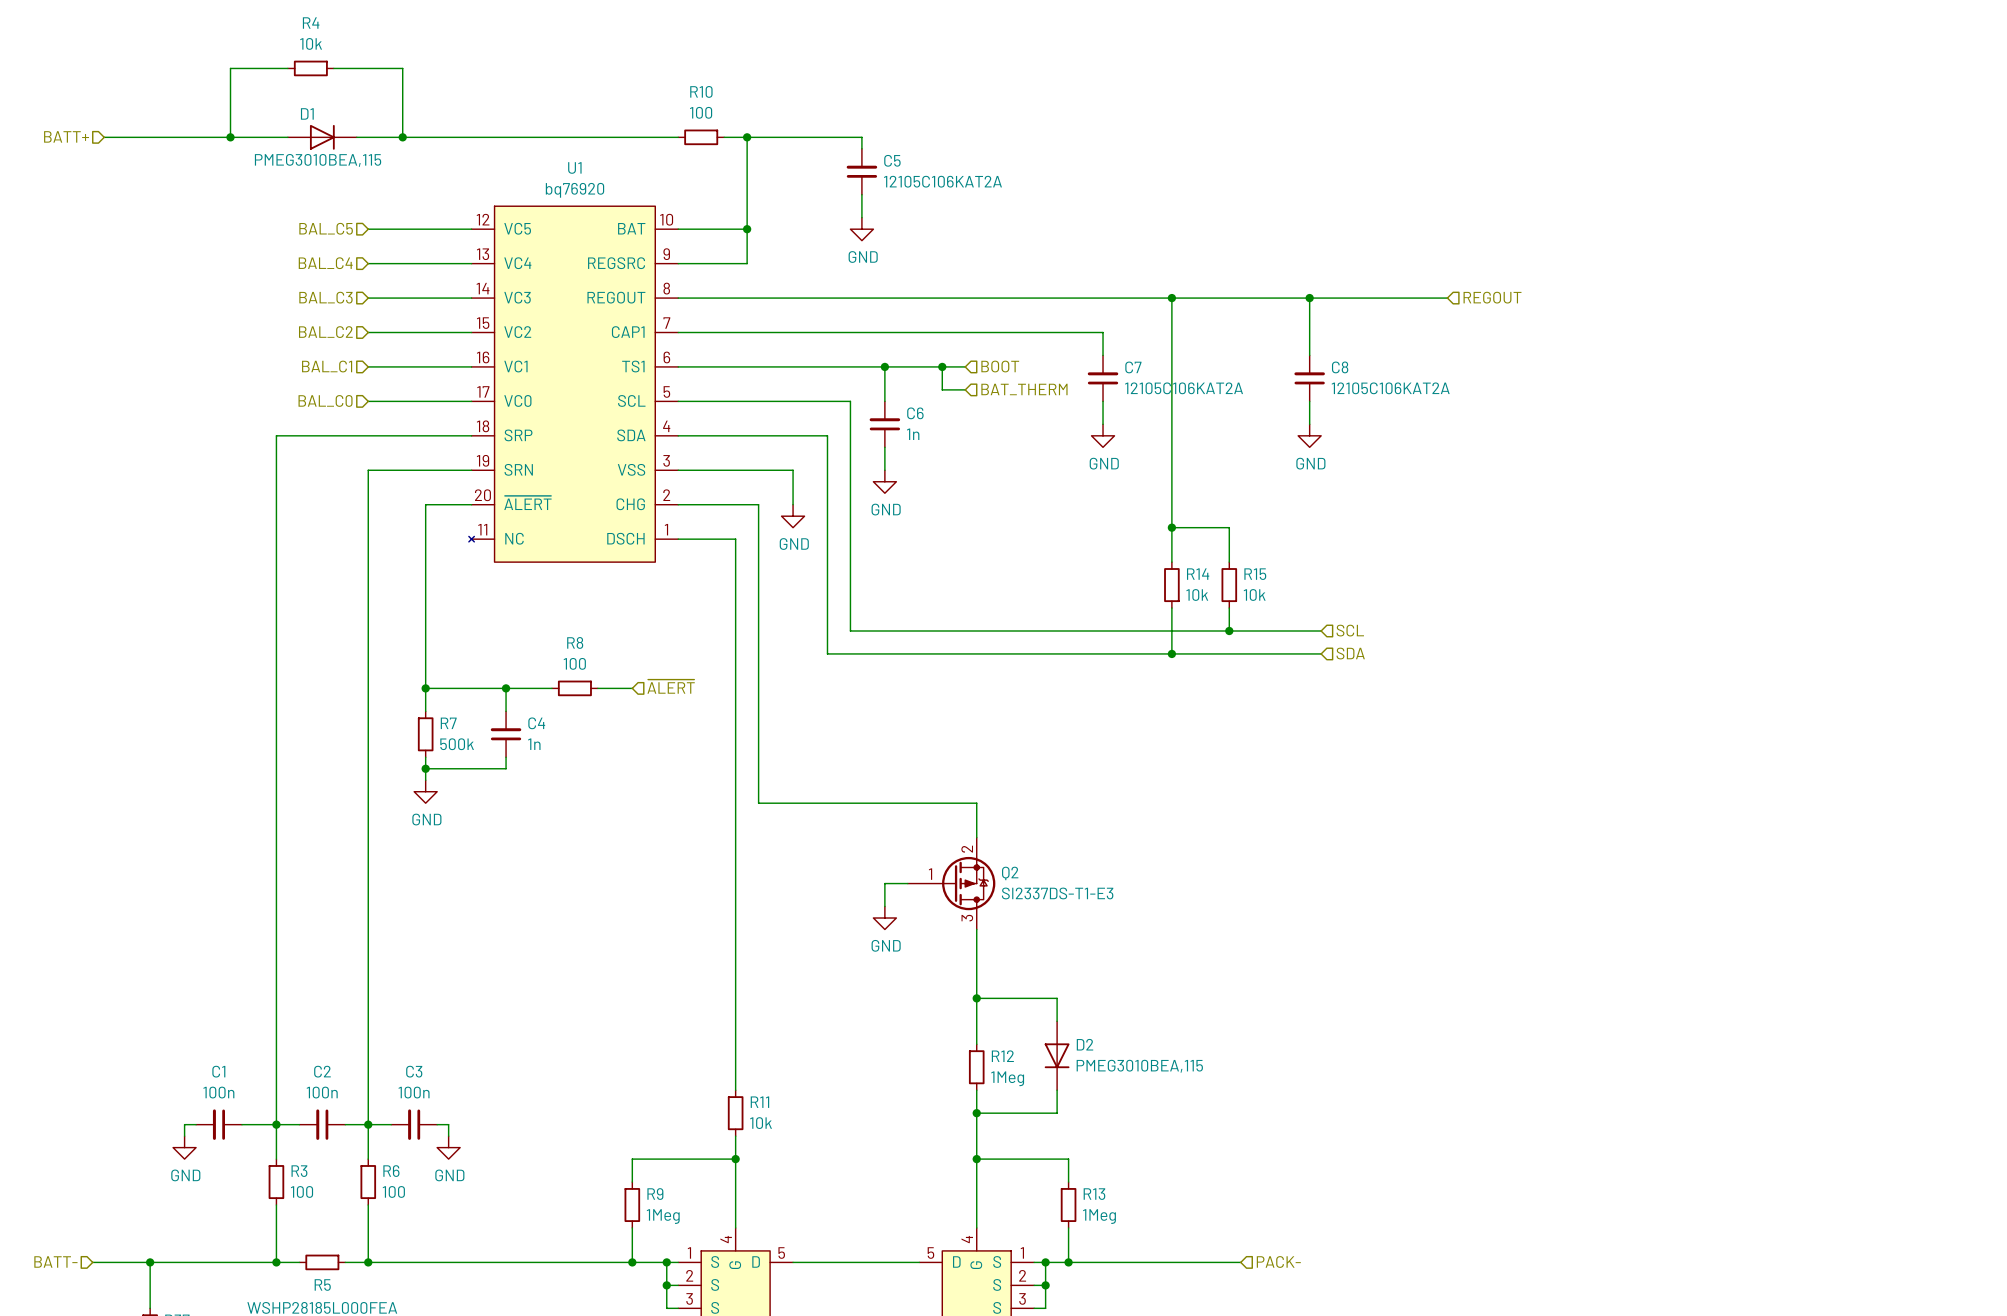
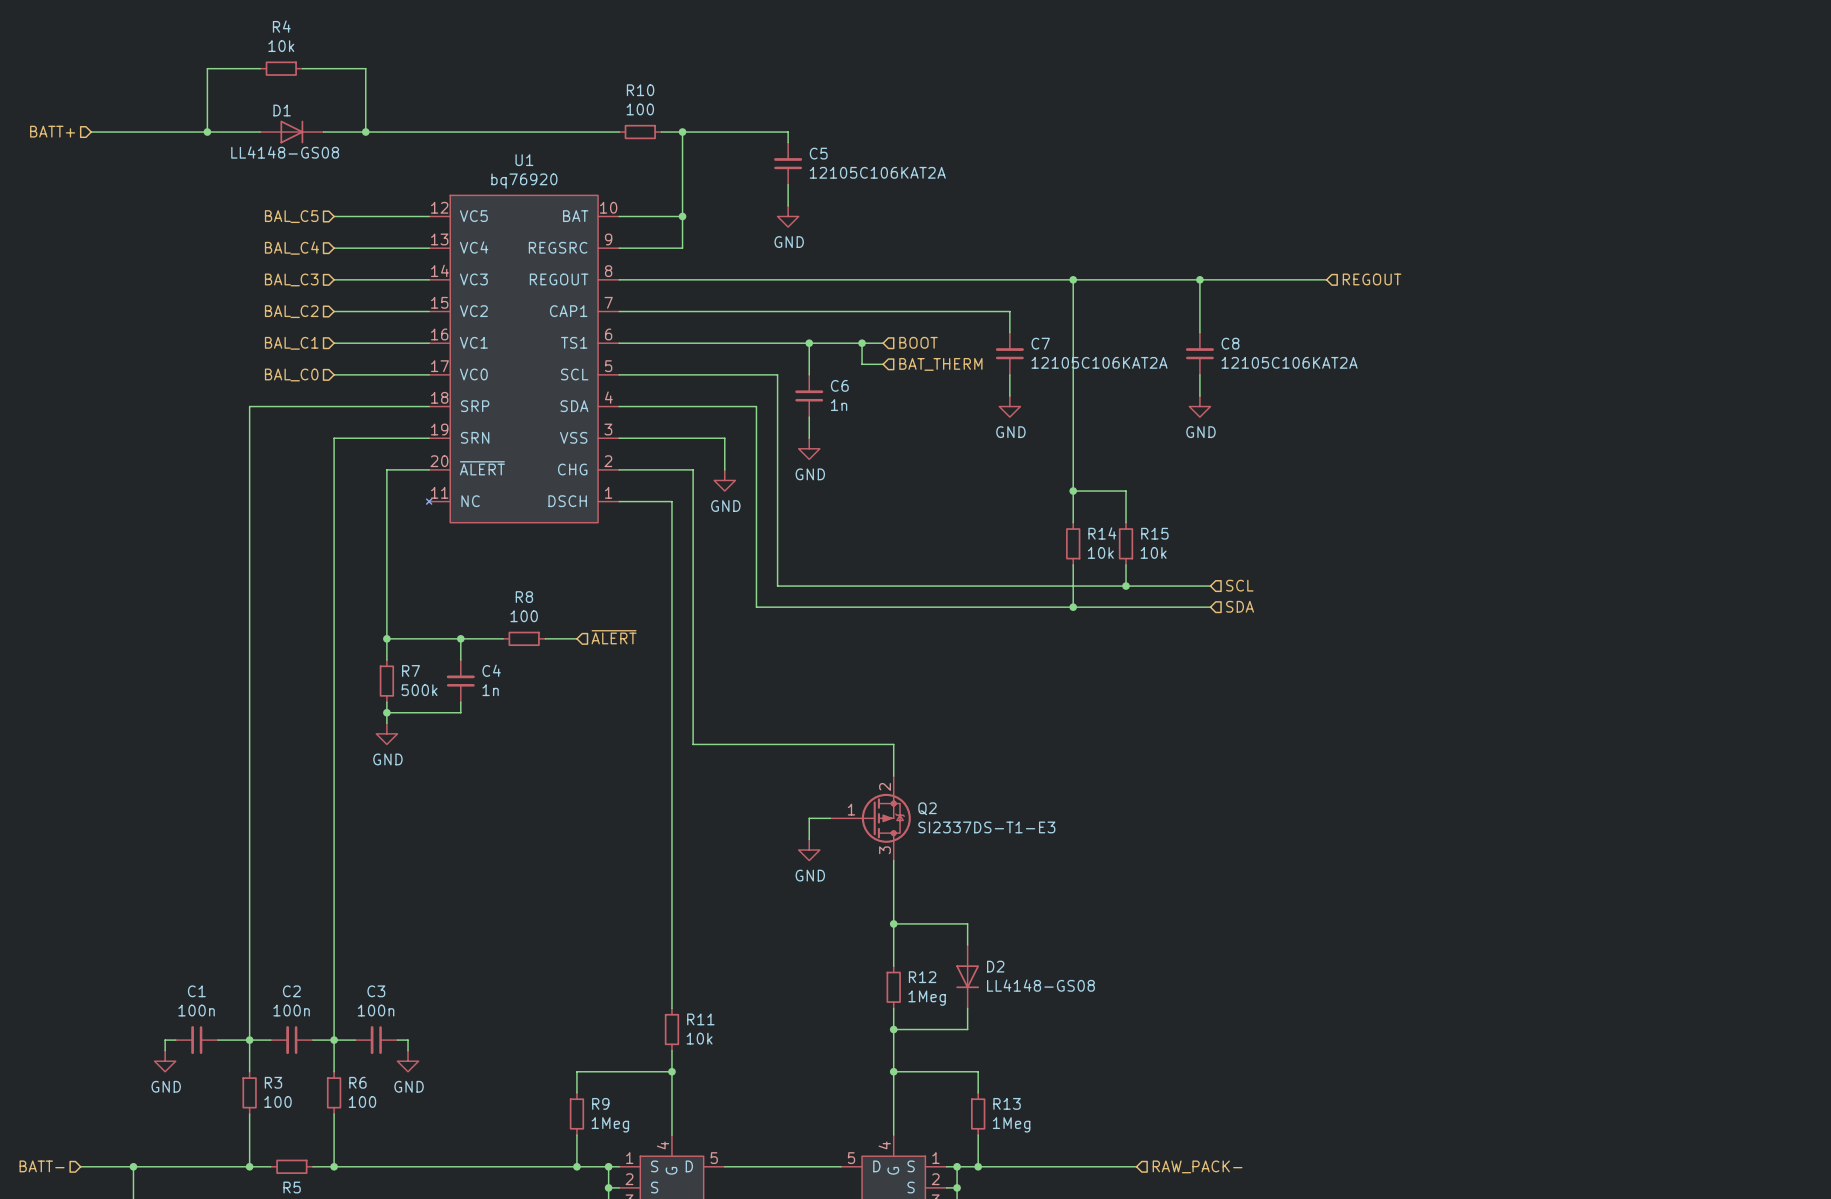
D1 value: PMEG3010BEA,115 (318, 160) -> LL4148-GS08 (285, 152)
D2 value: PMEG3010BEA,115 (1139, 1066) -> LL4148-GS08 (1040, 985)
hierarchical label: PACK- (1278, 1261) -> RAW_PACK- (1197, 1166)

